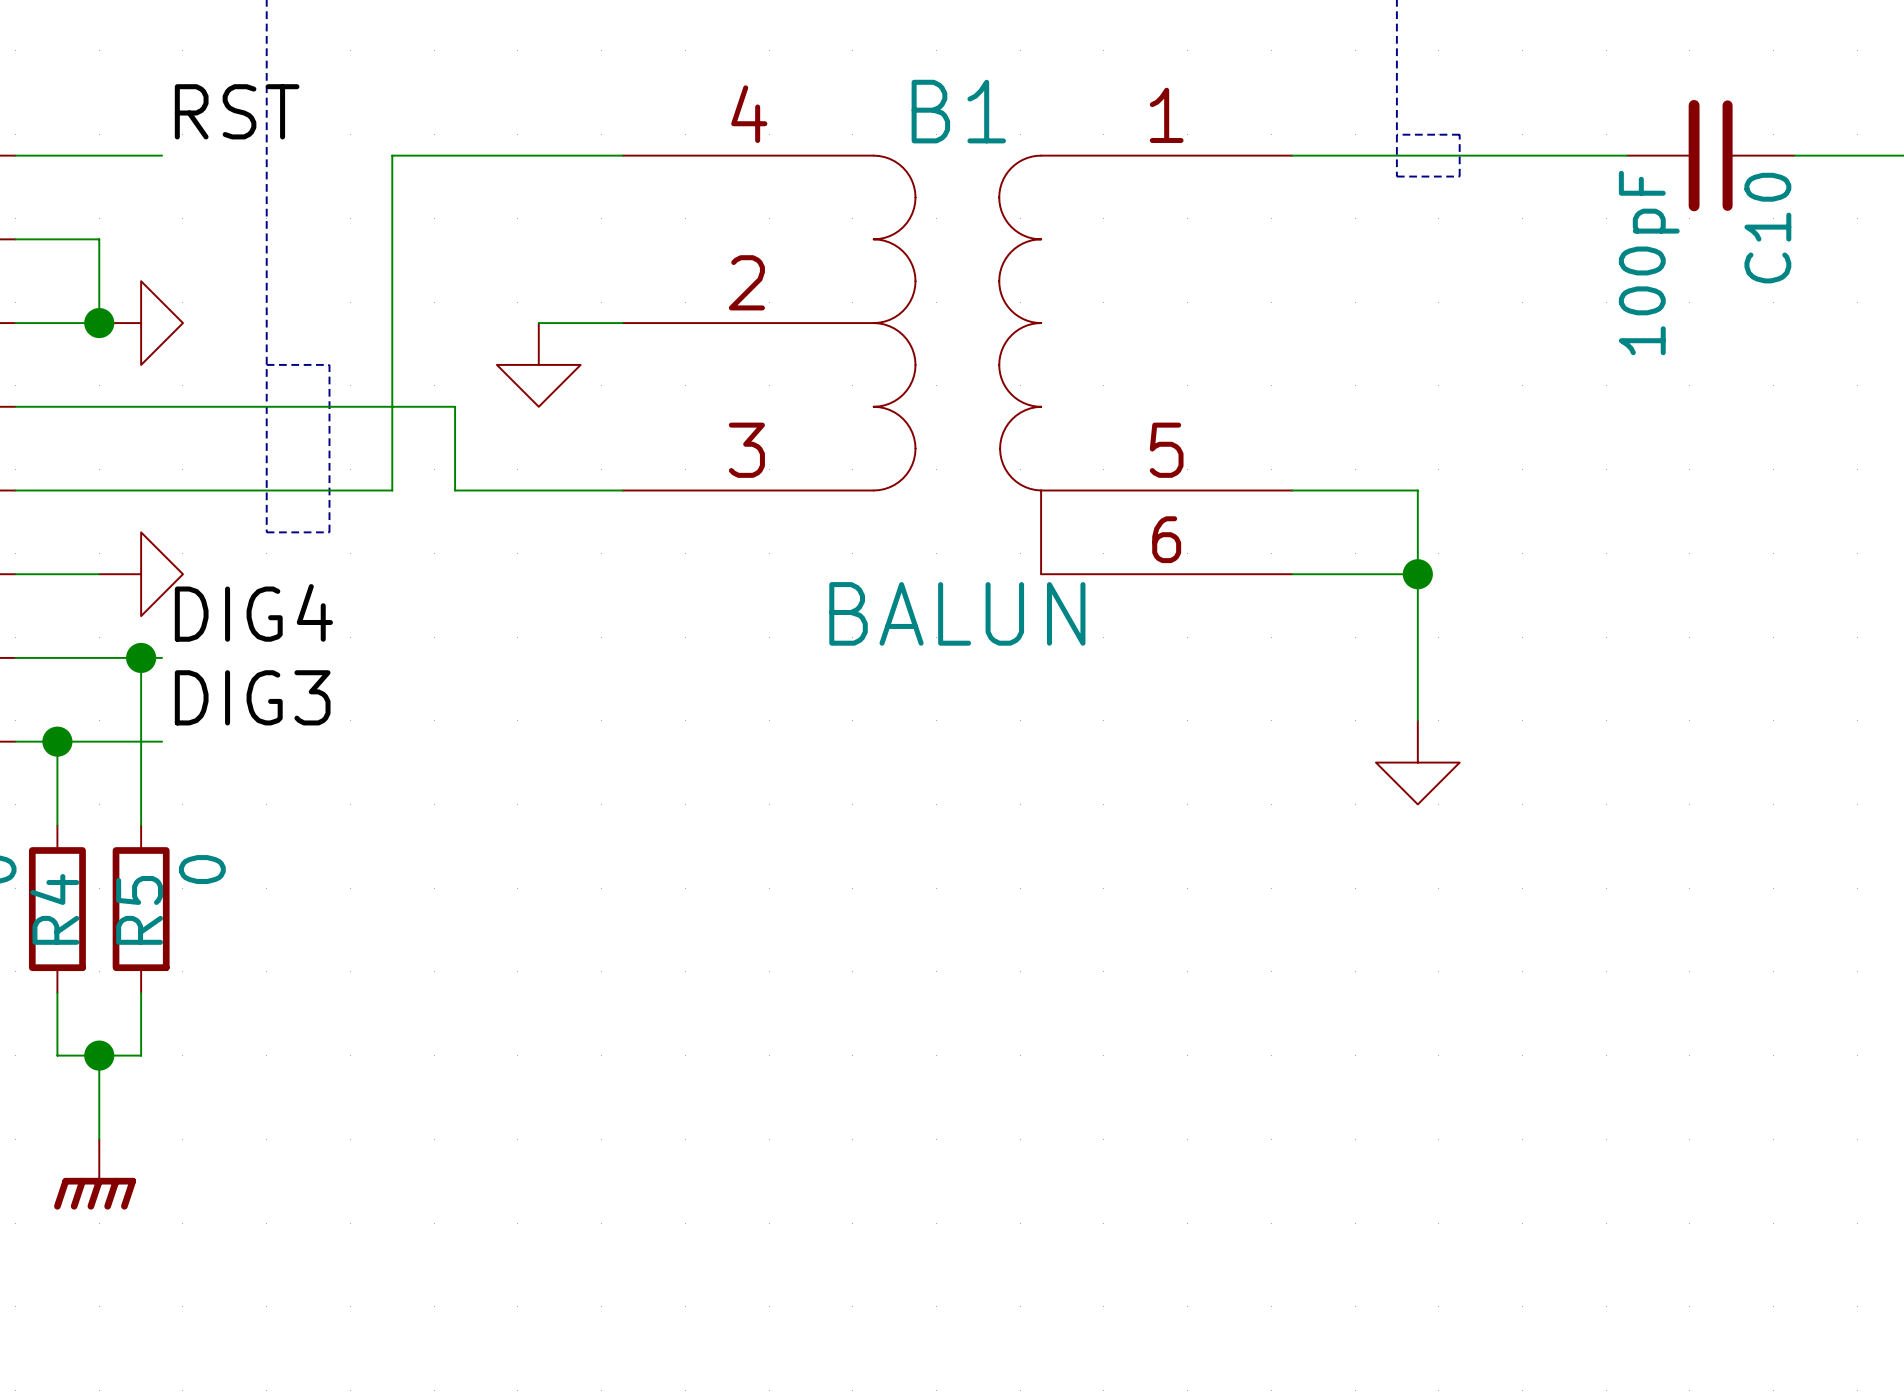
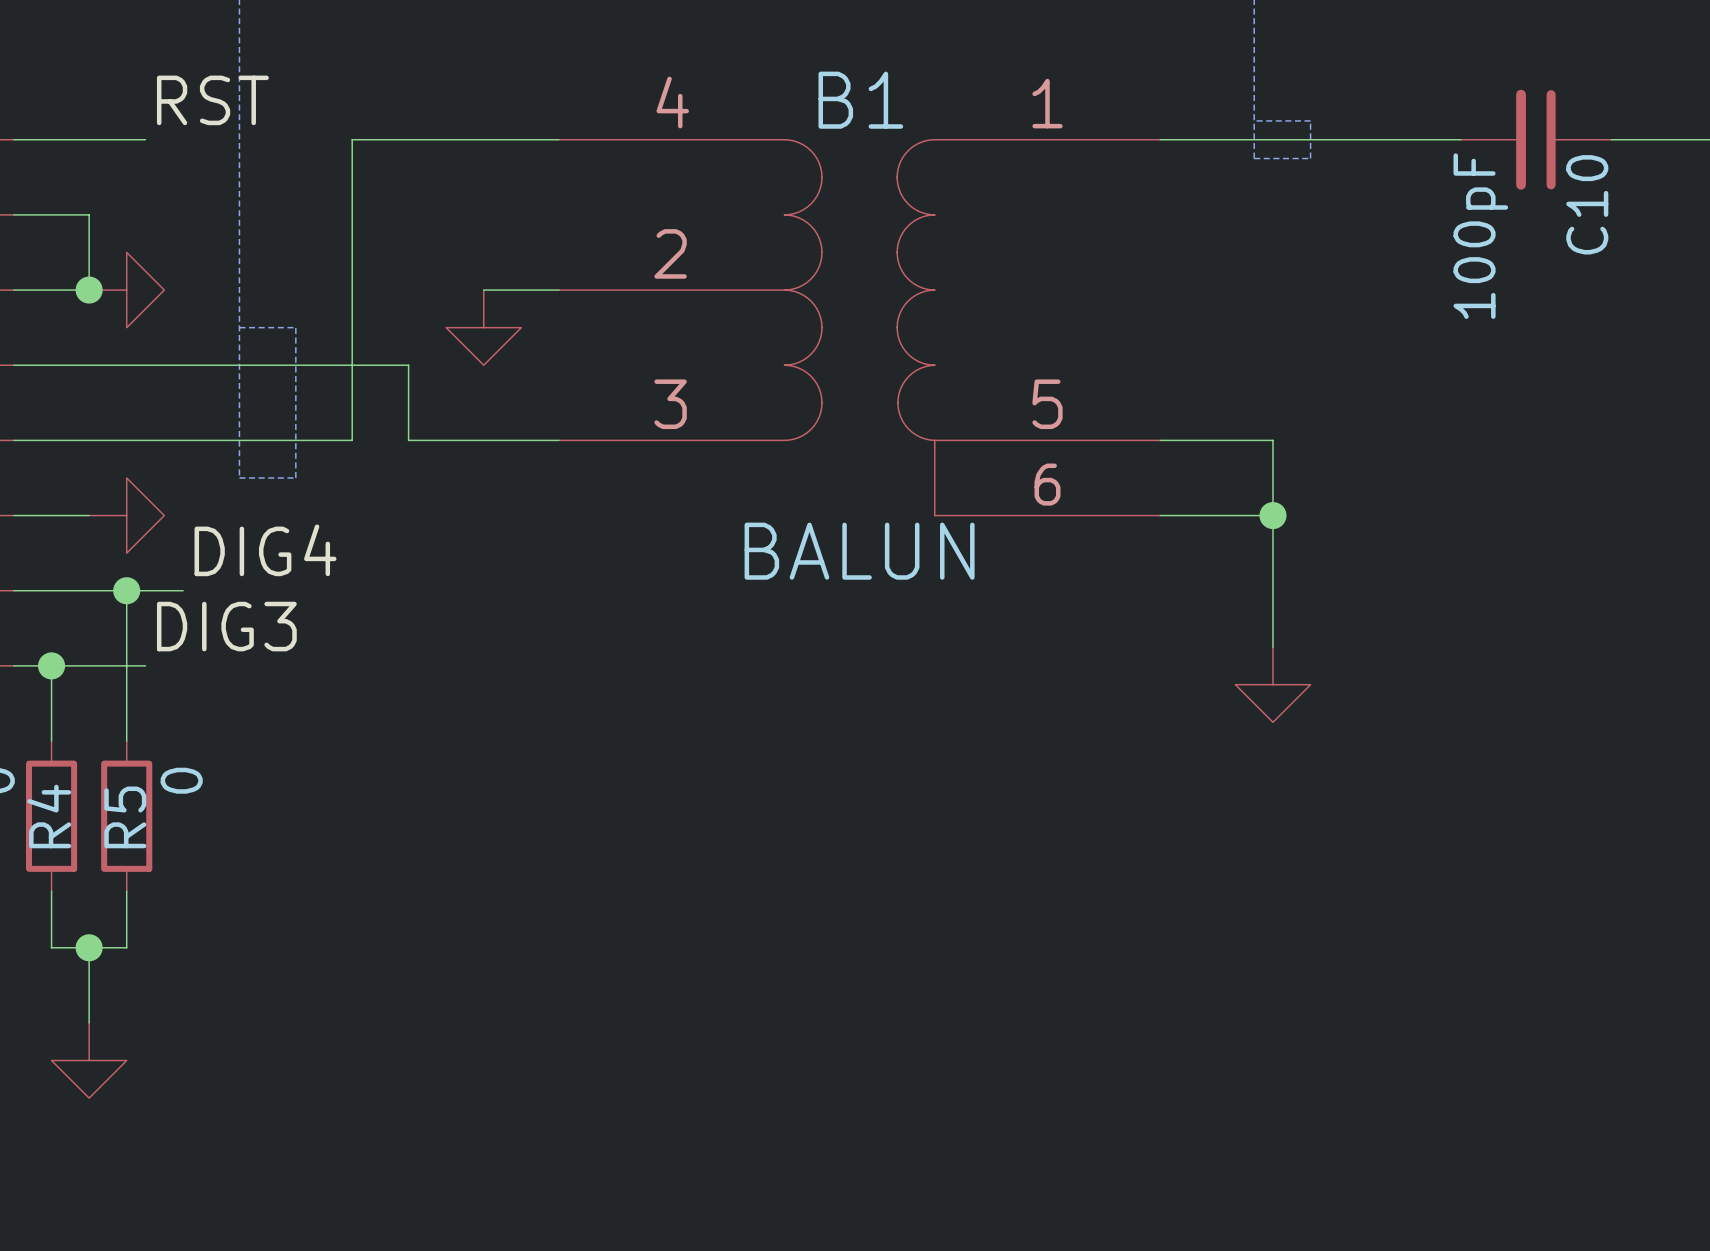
label position: DIG4 (253, 612) -> DIG4 (265, 550)
wire: none -> (145, 590) (183, 590)
power symbol shape: [54, 1139, 137, 1210] -> [51, 1022, 127, 1099]

